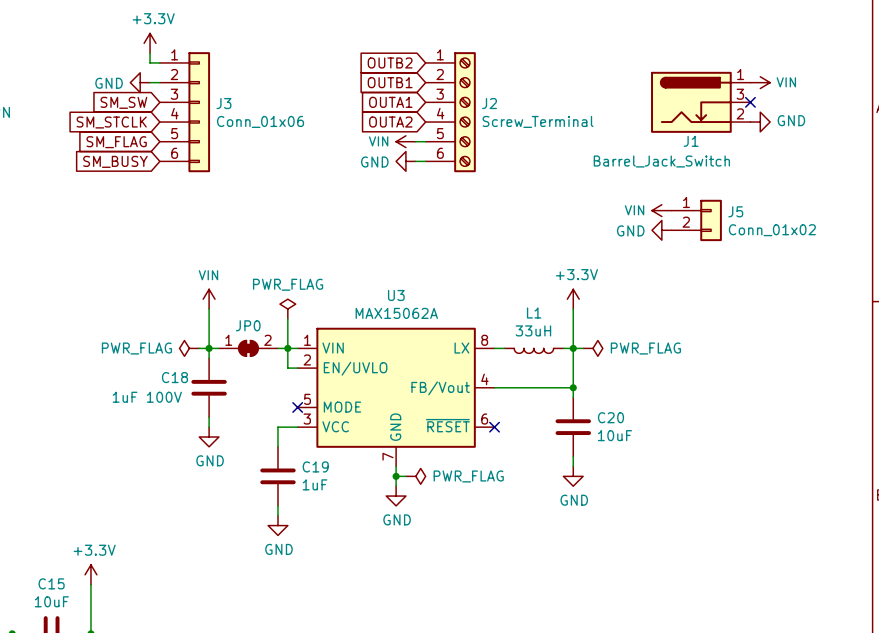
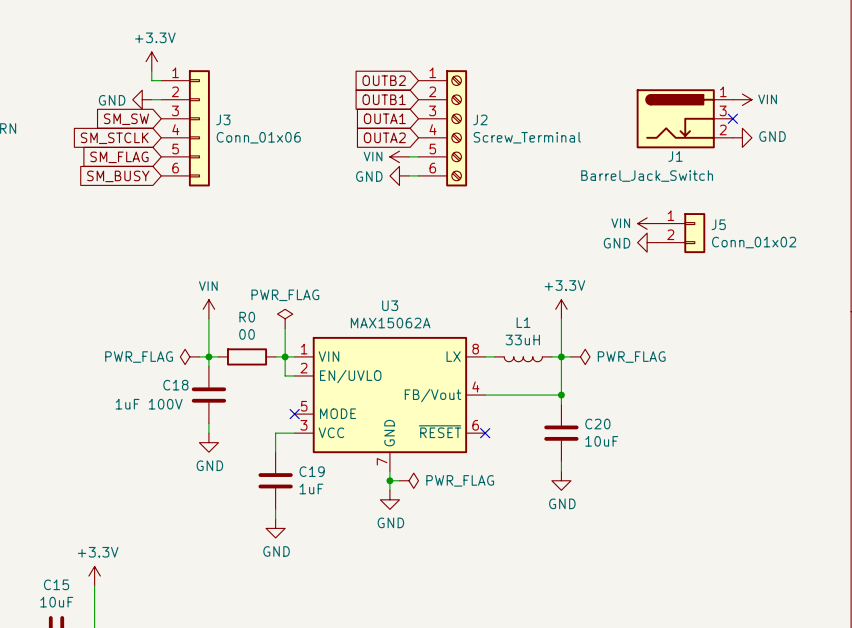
JP0: (248, 348) -> none
R0: none -> 00 (247, 356)

